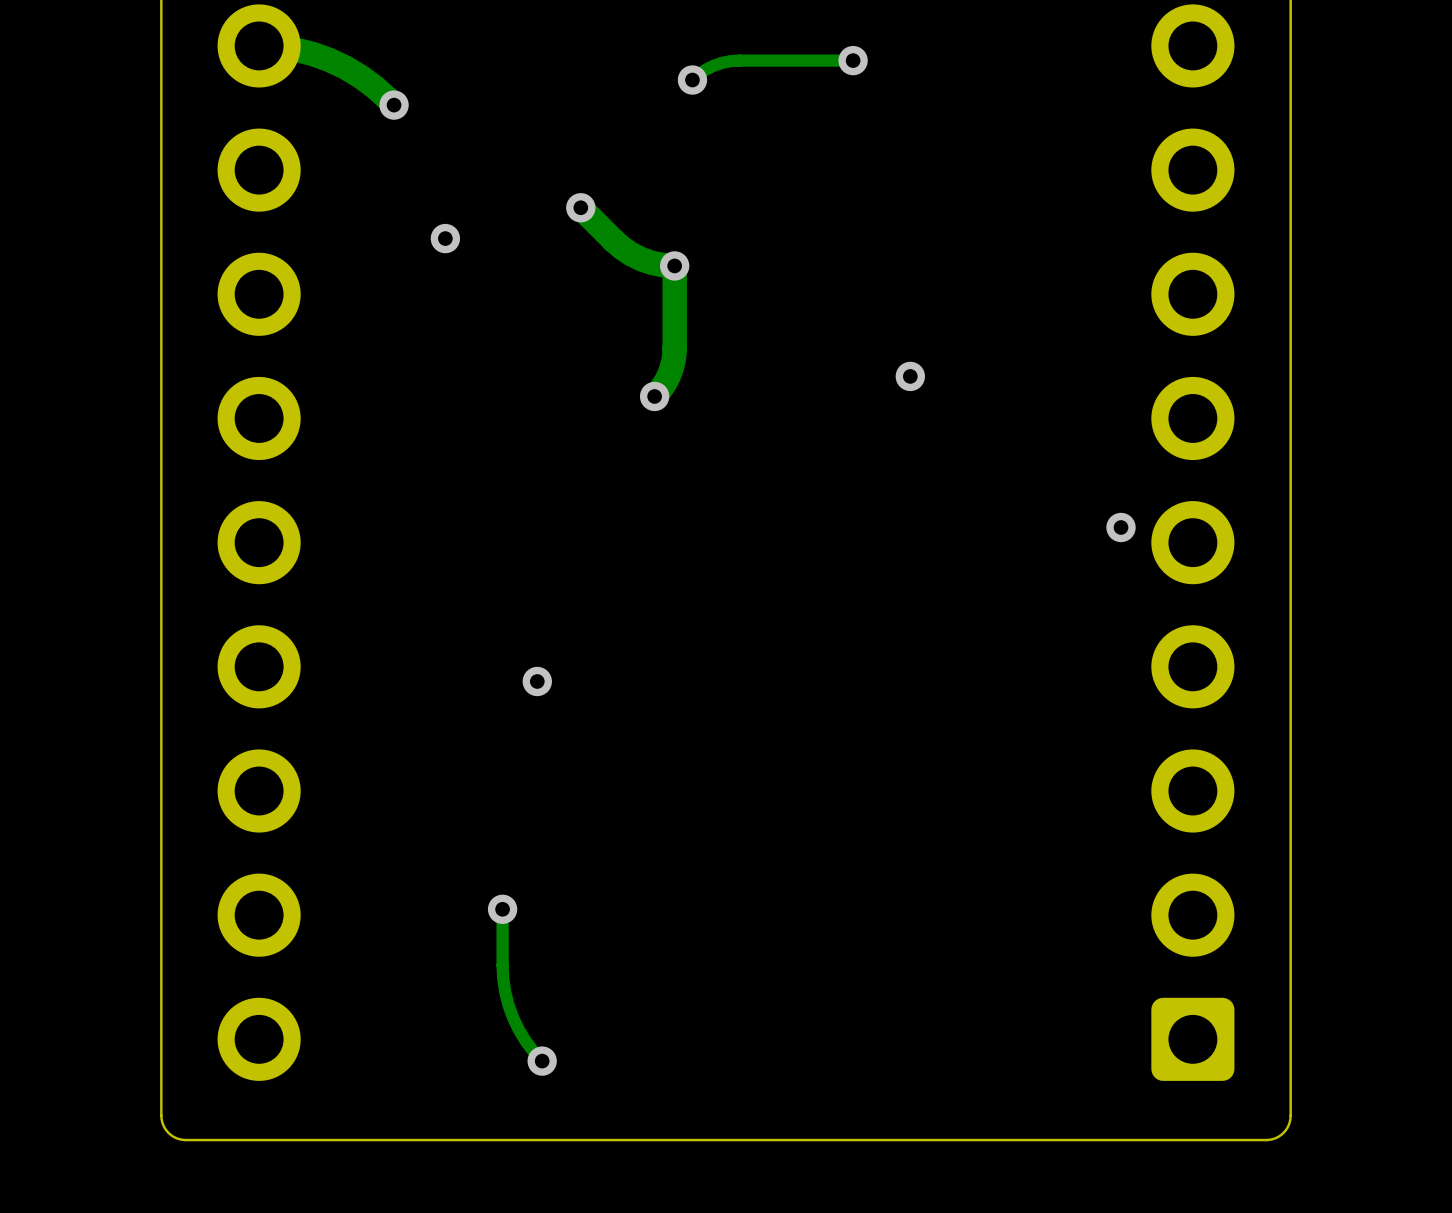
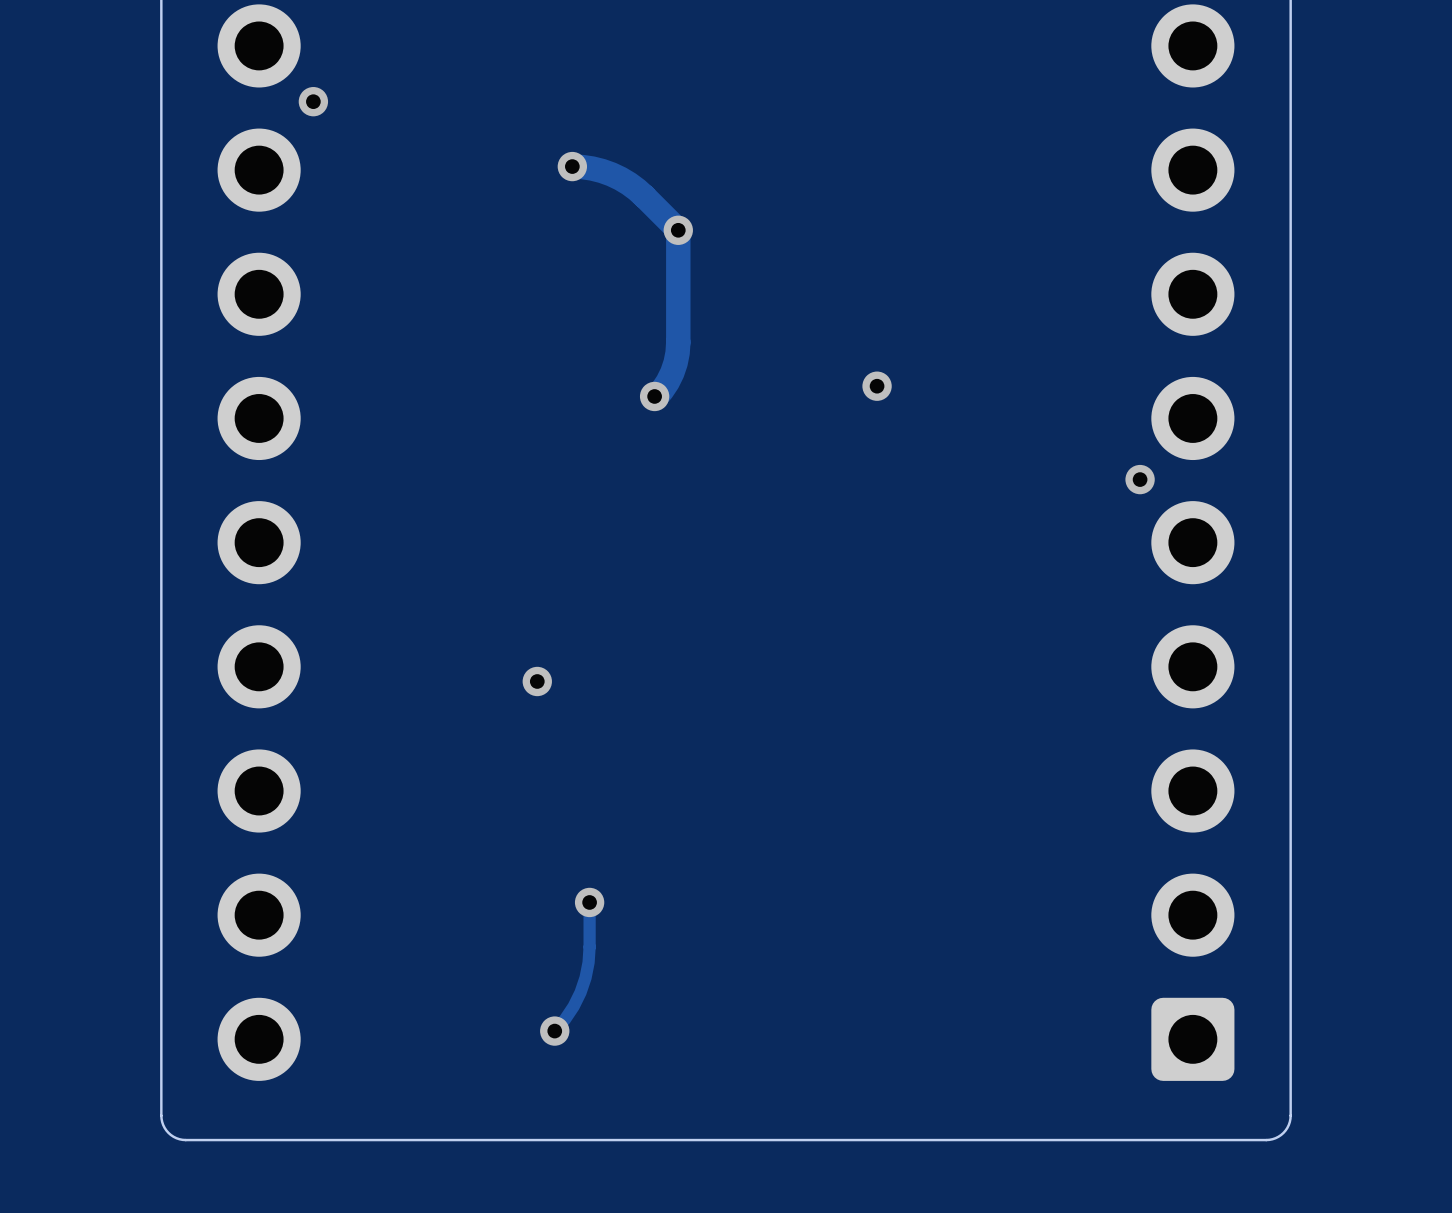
track: (259, 45) (294, 49) (329, 59) (360, 76) (394, 105) -> none
track: (853, 60) (730, 61) (706, 69) (692, 80) -> none
via: (853, 60) -> none
via: (692, 80) -> none
via position: (394, 105) -> (313, 101)
track: none -> (572, 166) (601, 170) (628, 183) (678, 230) (677, 352) (667, 382) (655, 398)
track: (580, 207) (613, 240) (631, 254) (652, 263) (674, 265) (673, 361) (666, 380) (654, 396) -> none
via position: (580, 207) -> (572, 166)
via: (445, 238) -> none
via position: (674, 265) -> (678, 230)
via position: (910, 376) -> (877, 386)
via position: (1121, 527) -> (1140, 479)
track: none -> (589, 902) (589, 946) (585, 977) (573, 1006) (554, 1031)
via: none -> (589, 902)
track: (502, 909) (503, 978) (508, 1004) (518, 1029) (542, 1061) -> none
via: (502, 909) -> none
via position: (542, 1061) -> (554, 1031)

